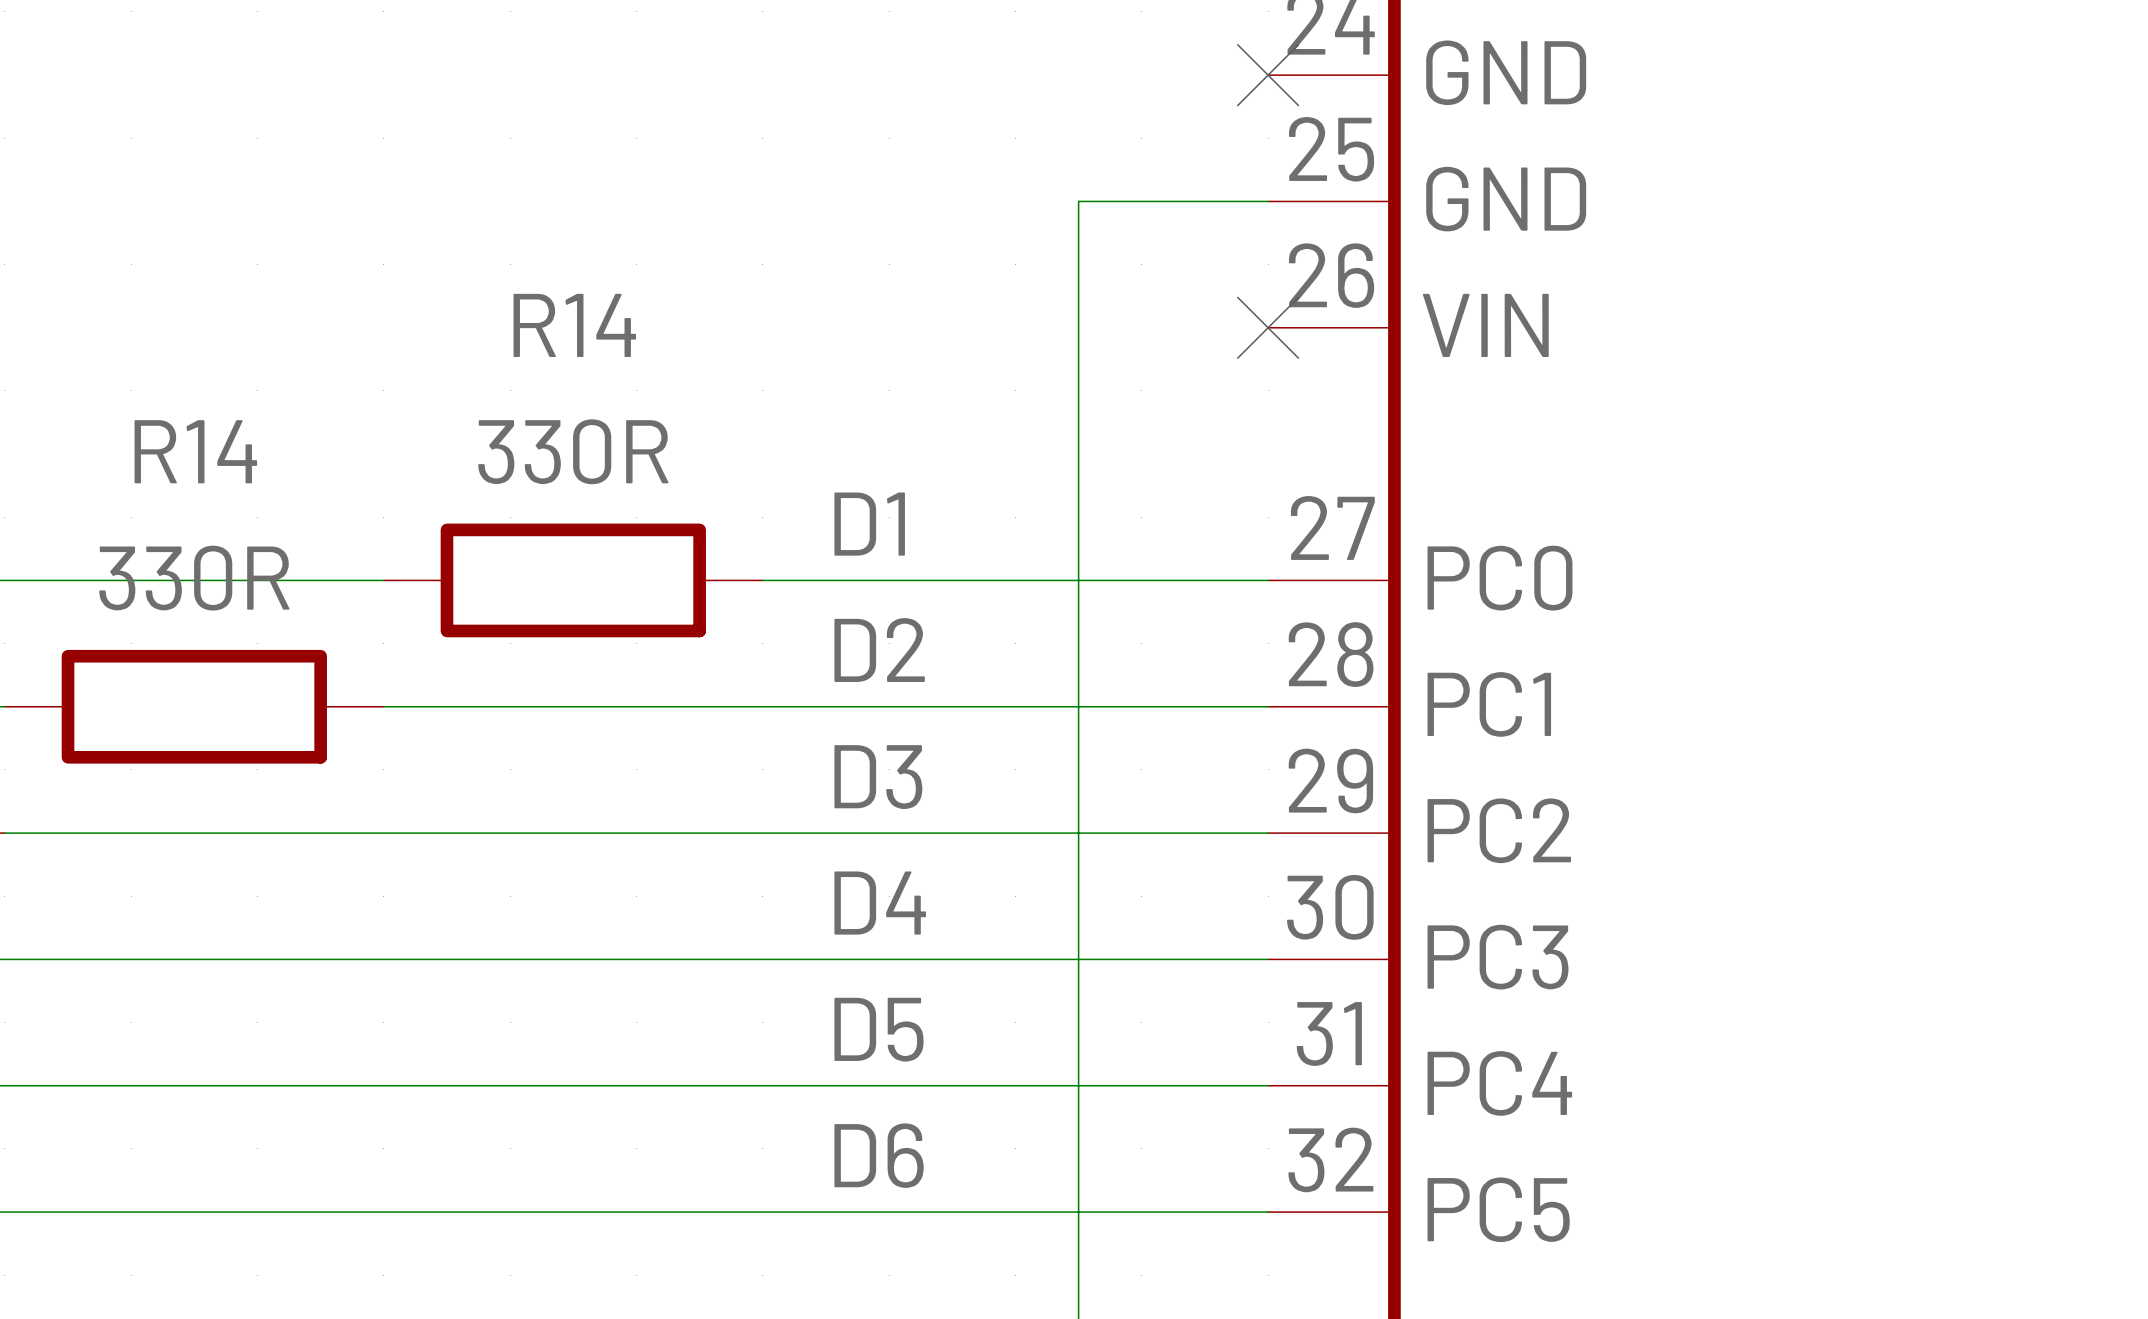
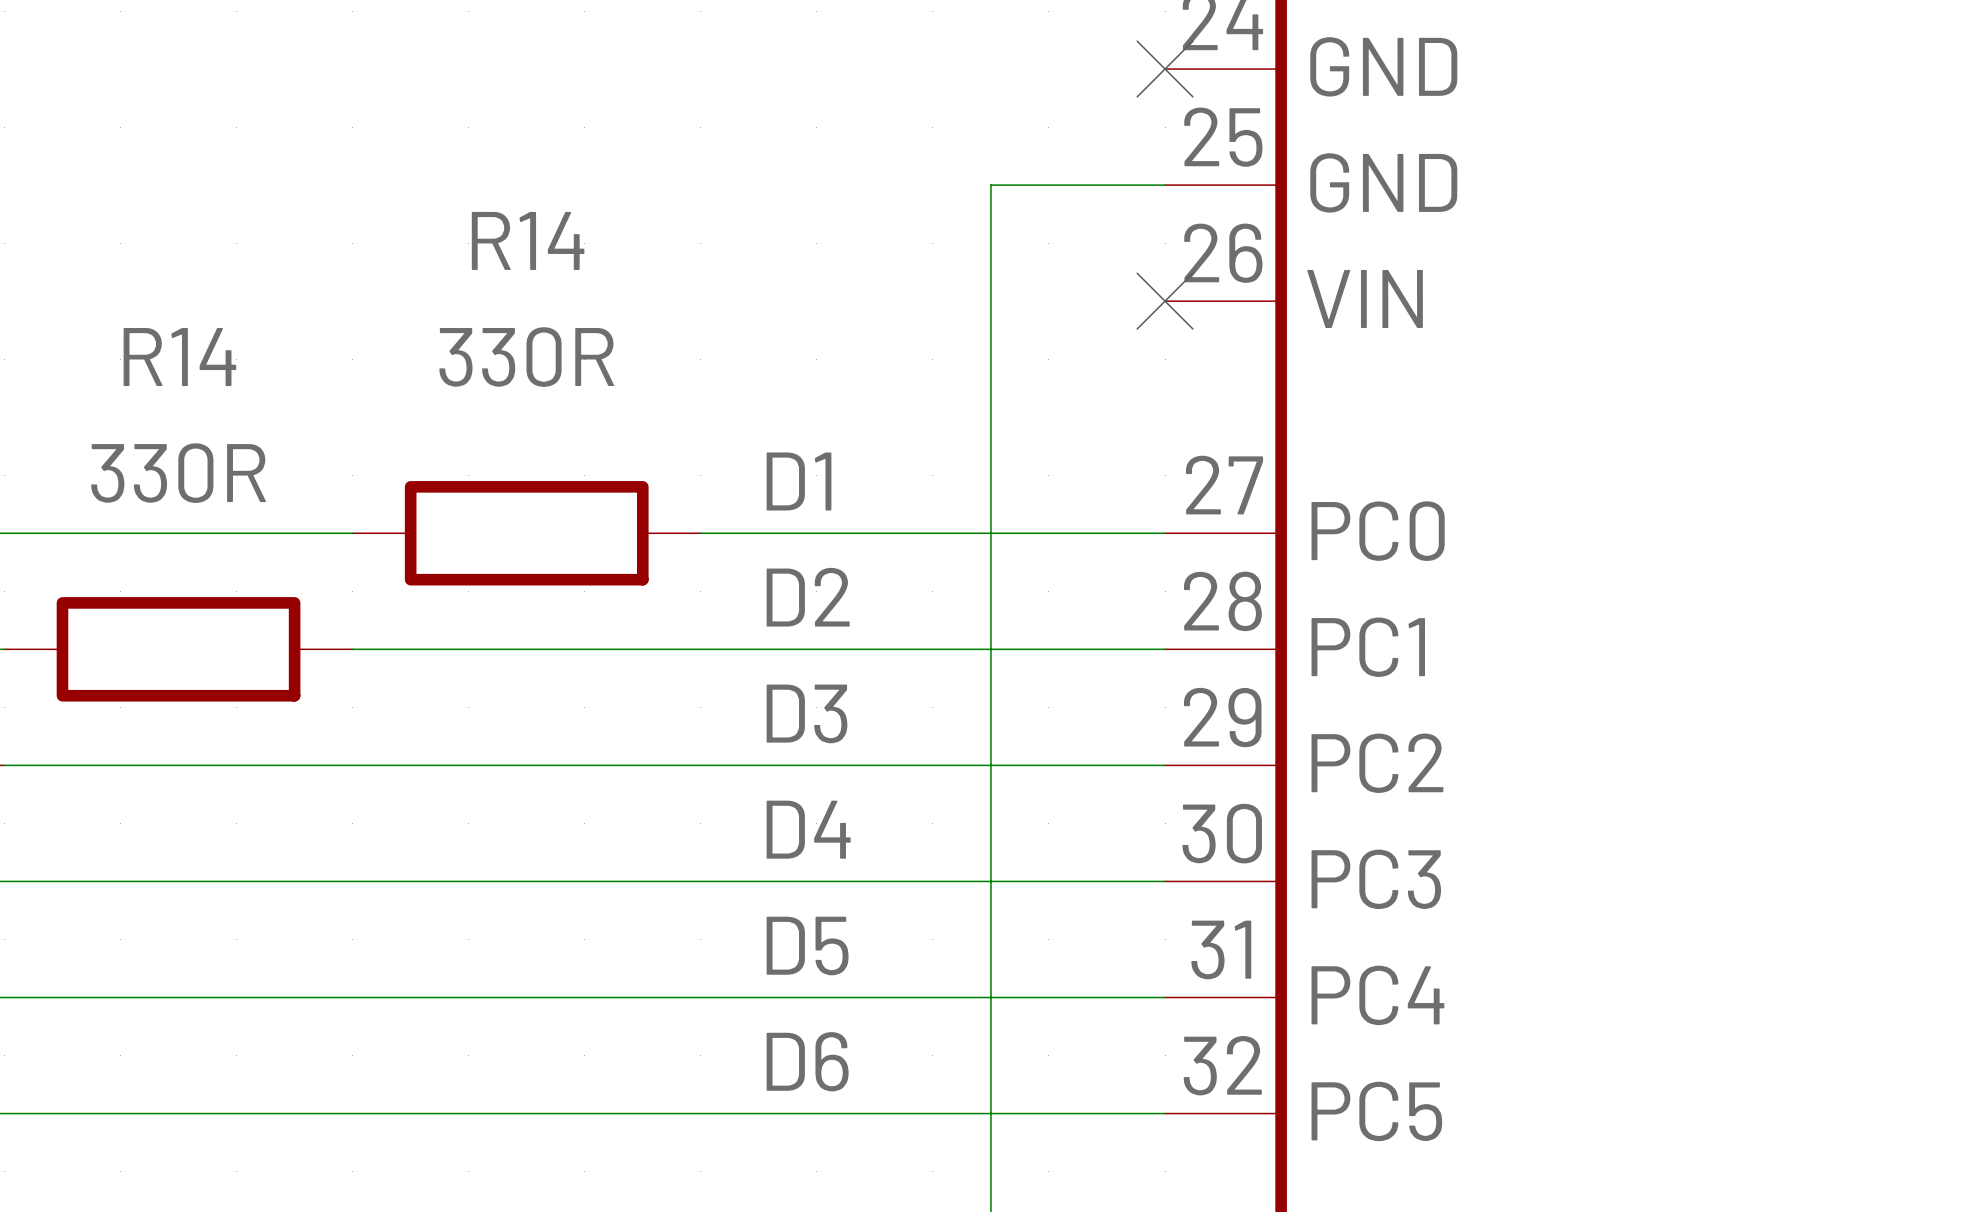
R14 name position: R14 (574, 325) -> R14 (528, 240)
R14 name position: R14 (195, 451) -> R14 (179, 357)
R14 value position: 330R (573, 451) -> 330R (526, 357)
R14 value position: 330R (194, 578) -> 330R (178, 473)

